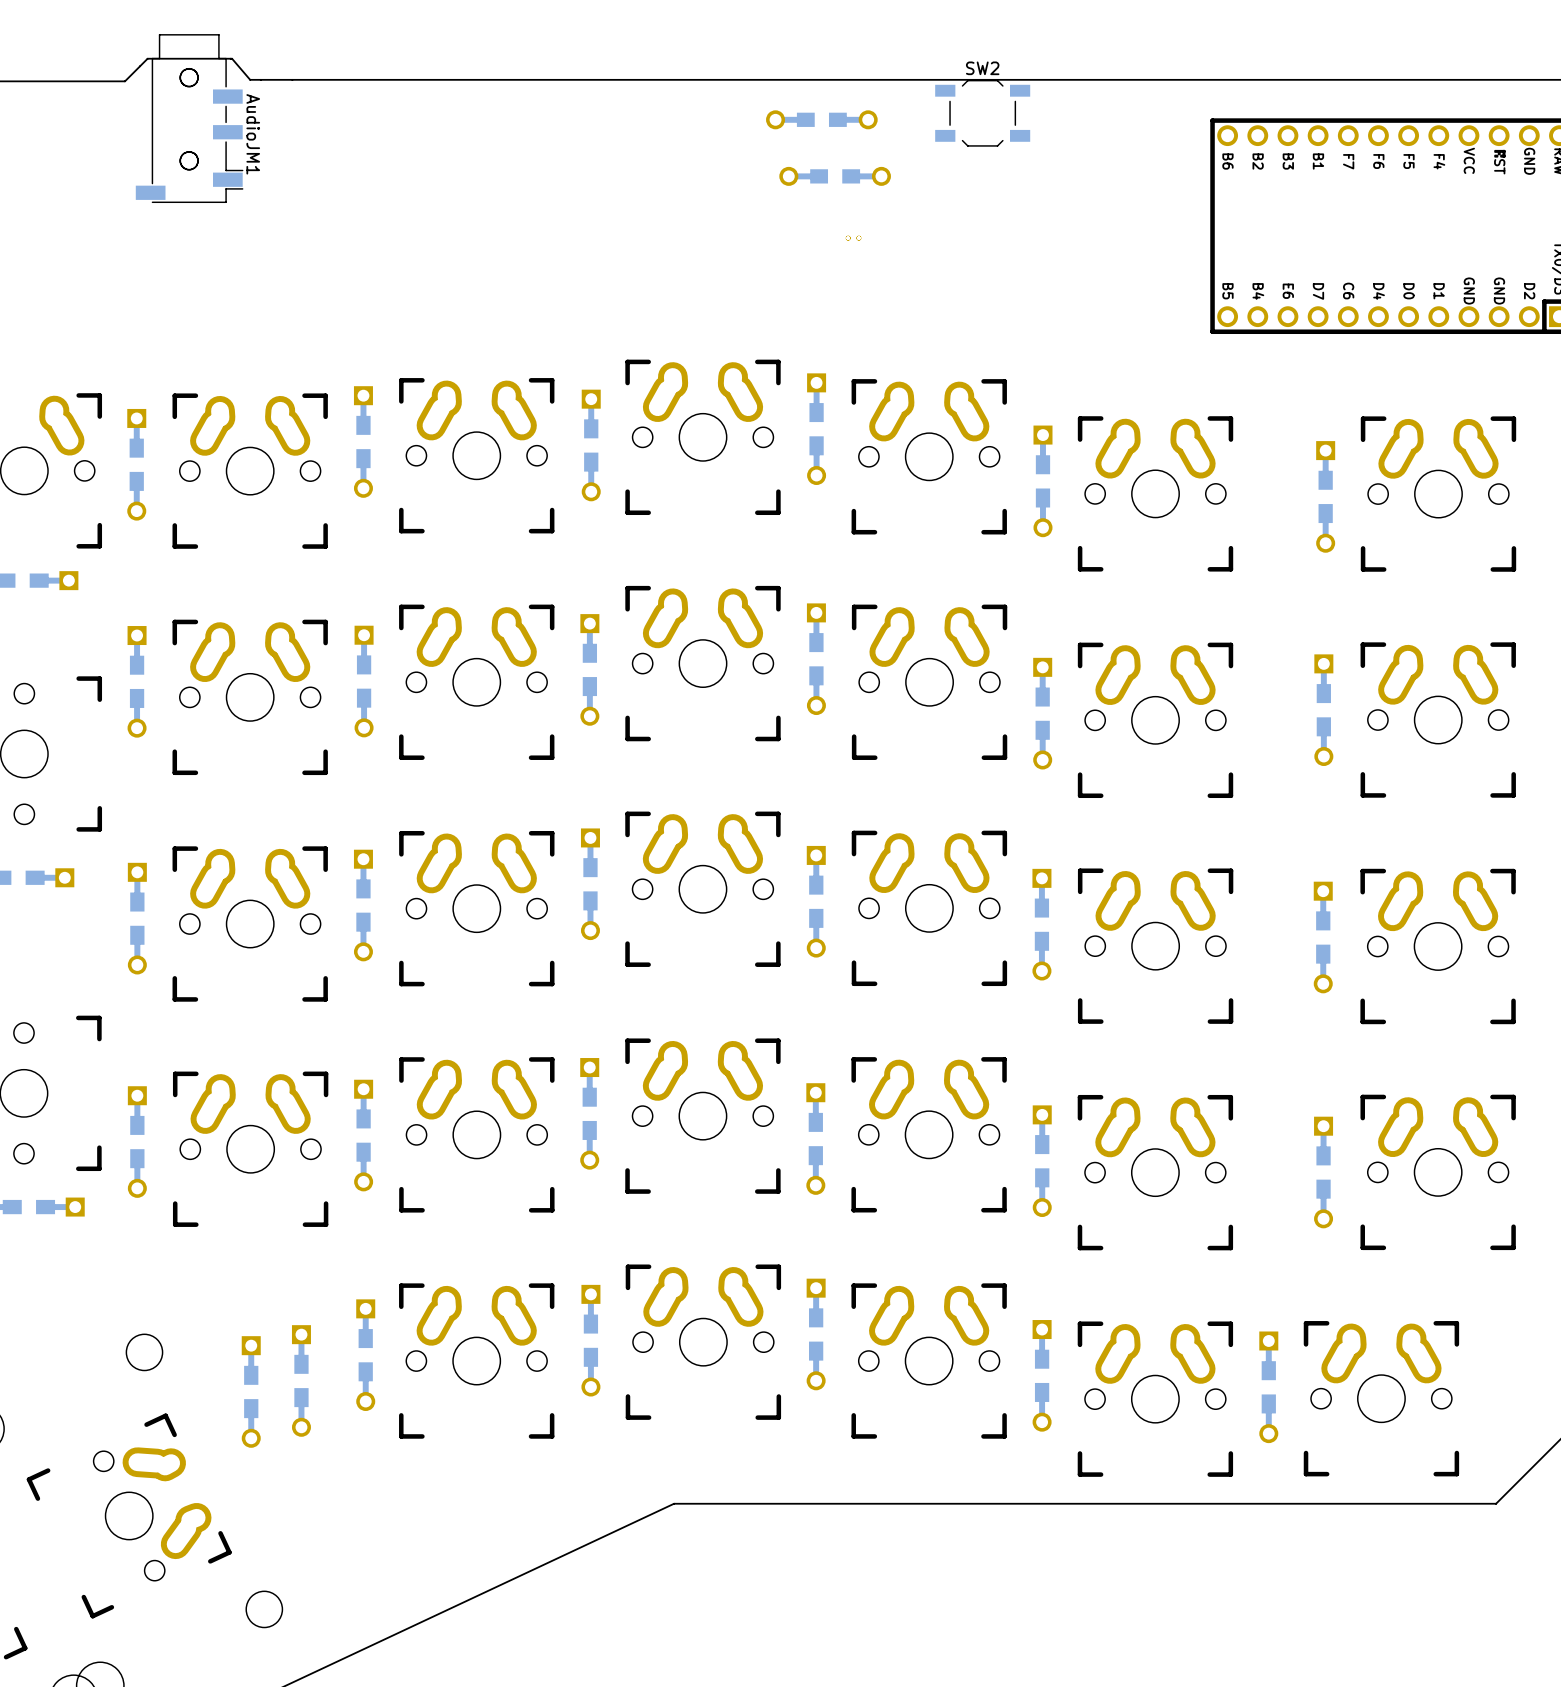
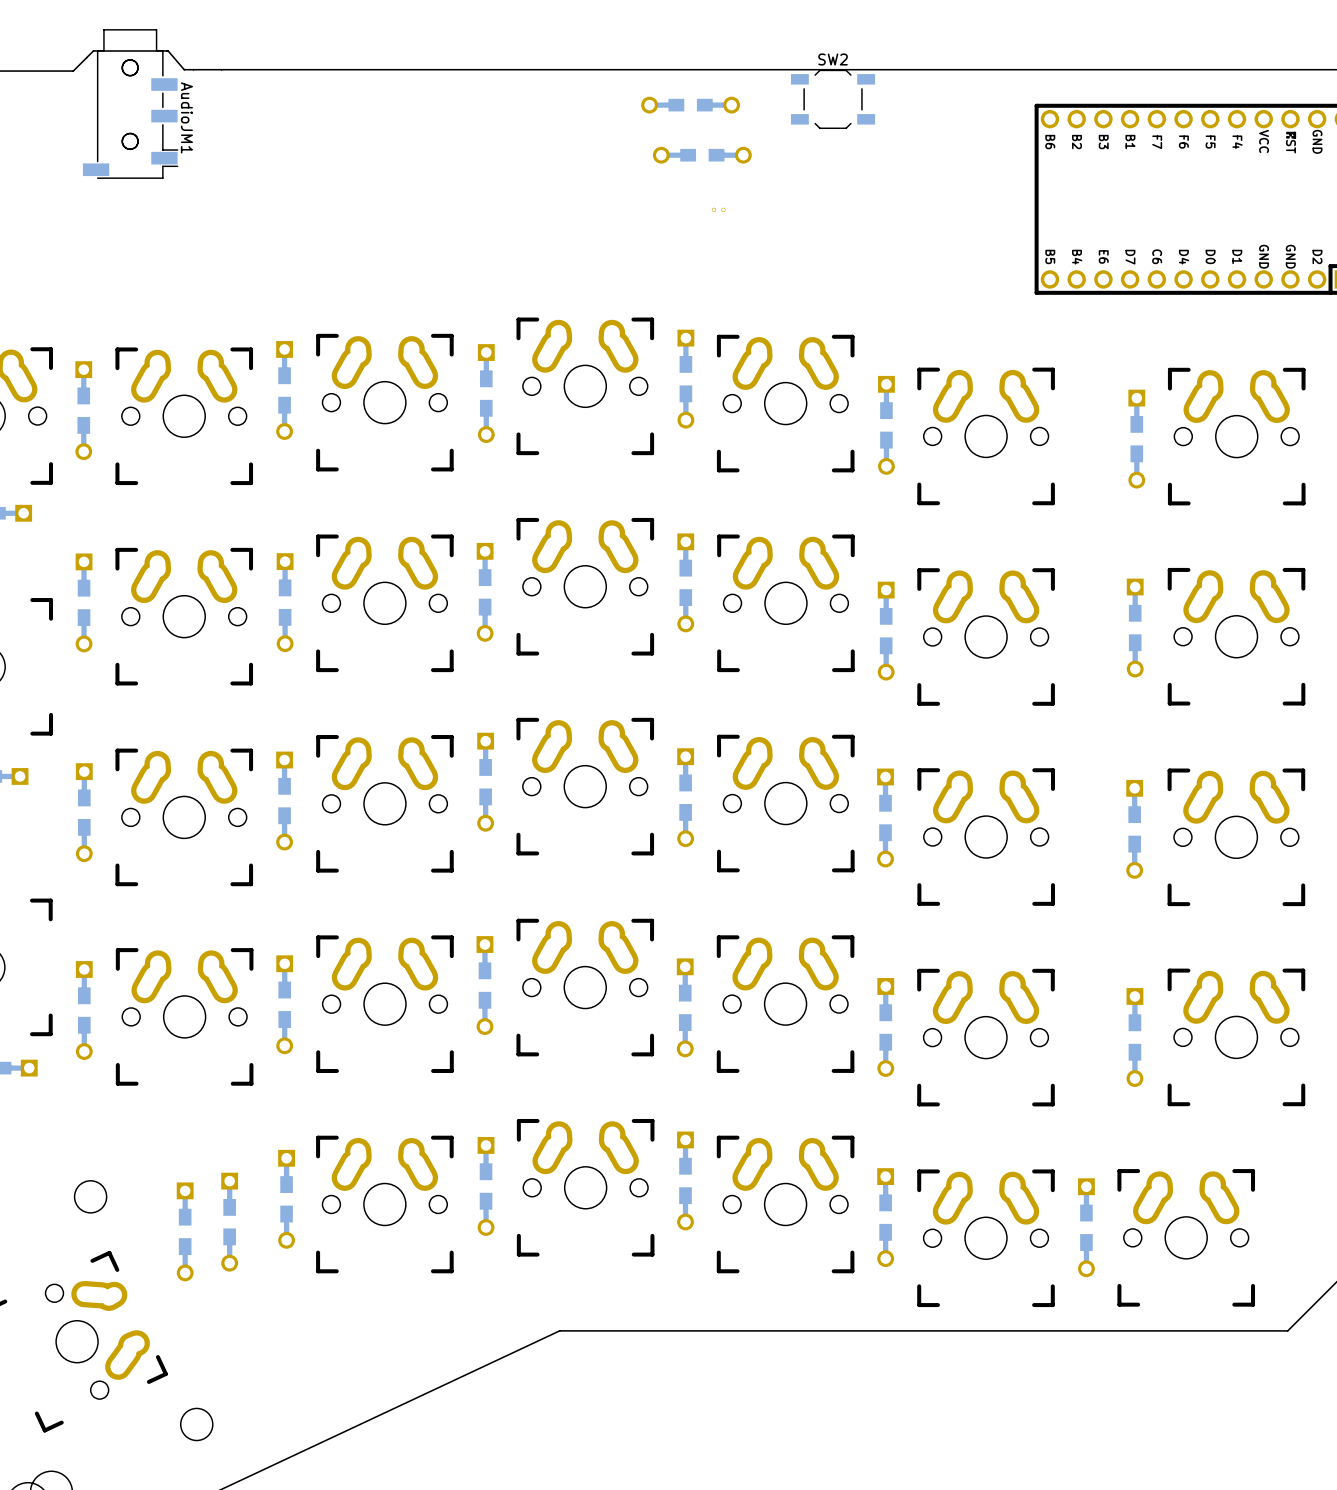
part: (853, 238) -> none

